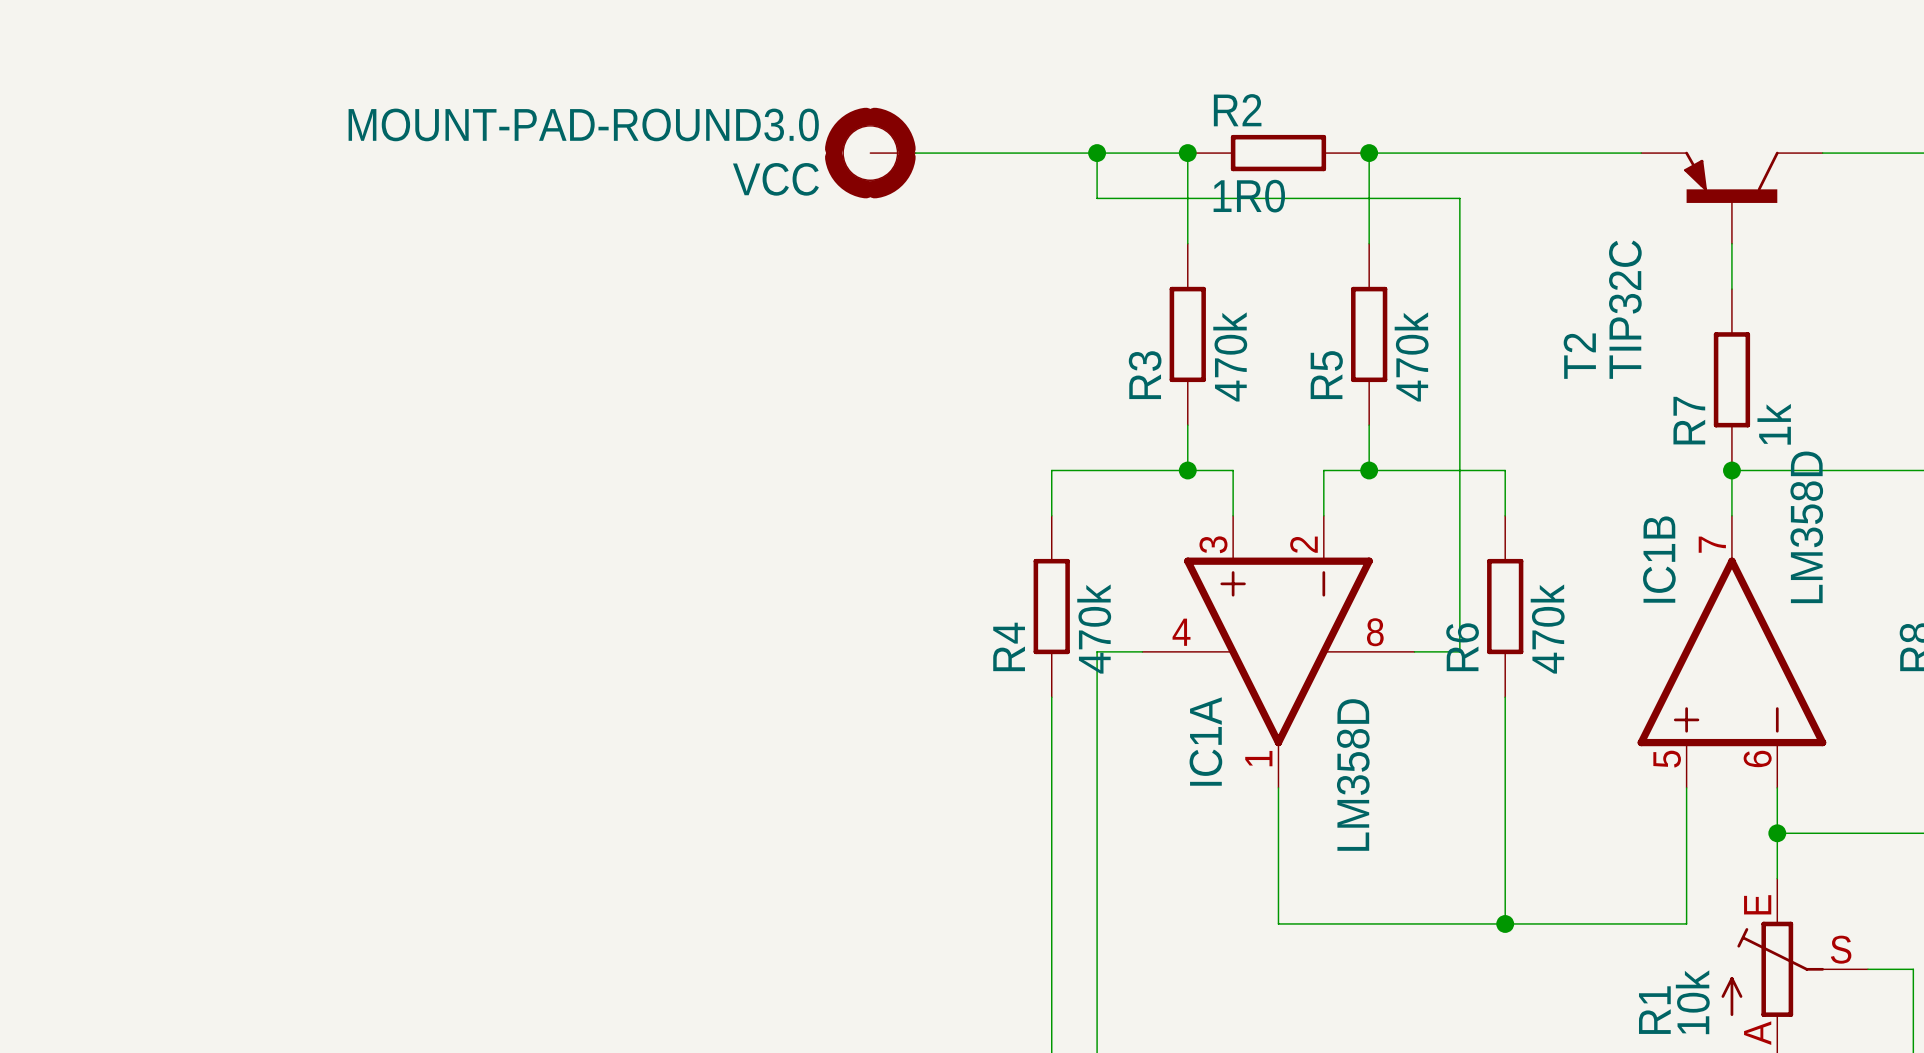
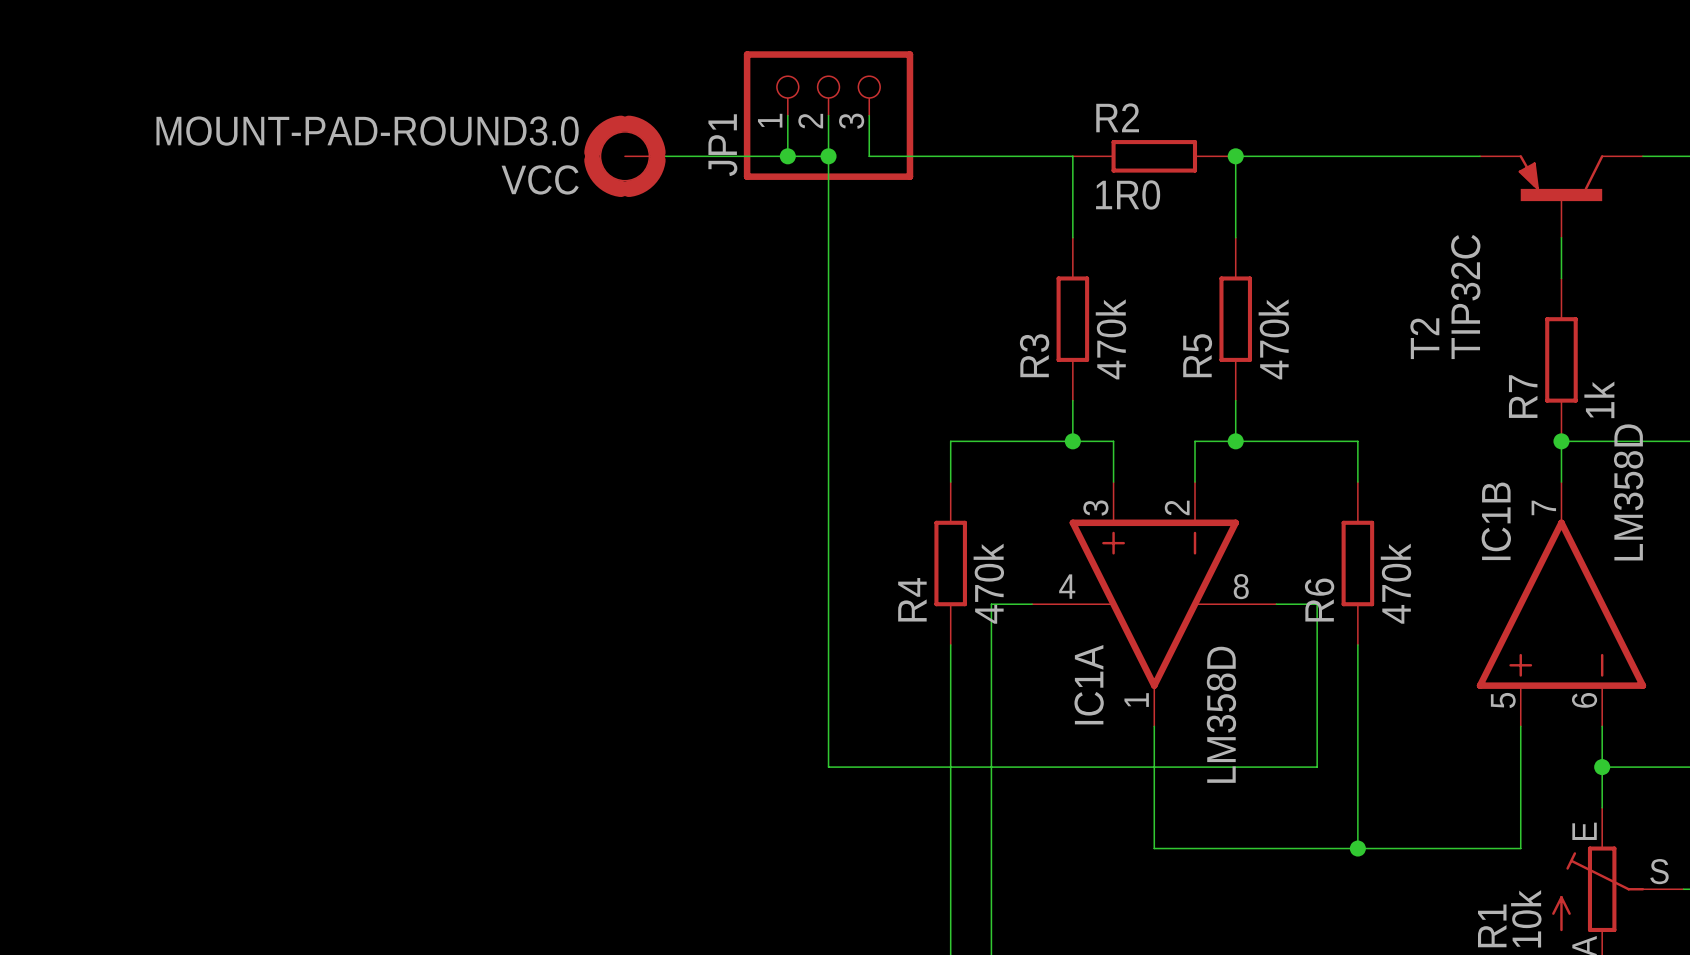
wire: none -> (787, 115) (787, 156)
JP1: none -> (828, 115)
wire: none -> (665, 156) (828, 156)
VCC position: (870, 153) -> (624, 156)
junction: none -> (787, 156)
wire: (915, 153) (961, 153) -> (869, 115) (869, 156)
junction: none -> (828, 156)
wire: (1097, 153) (1097, 198) (1459, 198) (1459, 651) -> (828, 115) (828, 767) (1317, 767) (1317, 604)
junction: (1097, 153) -> none
junction: (1187, 153) -> none

